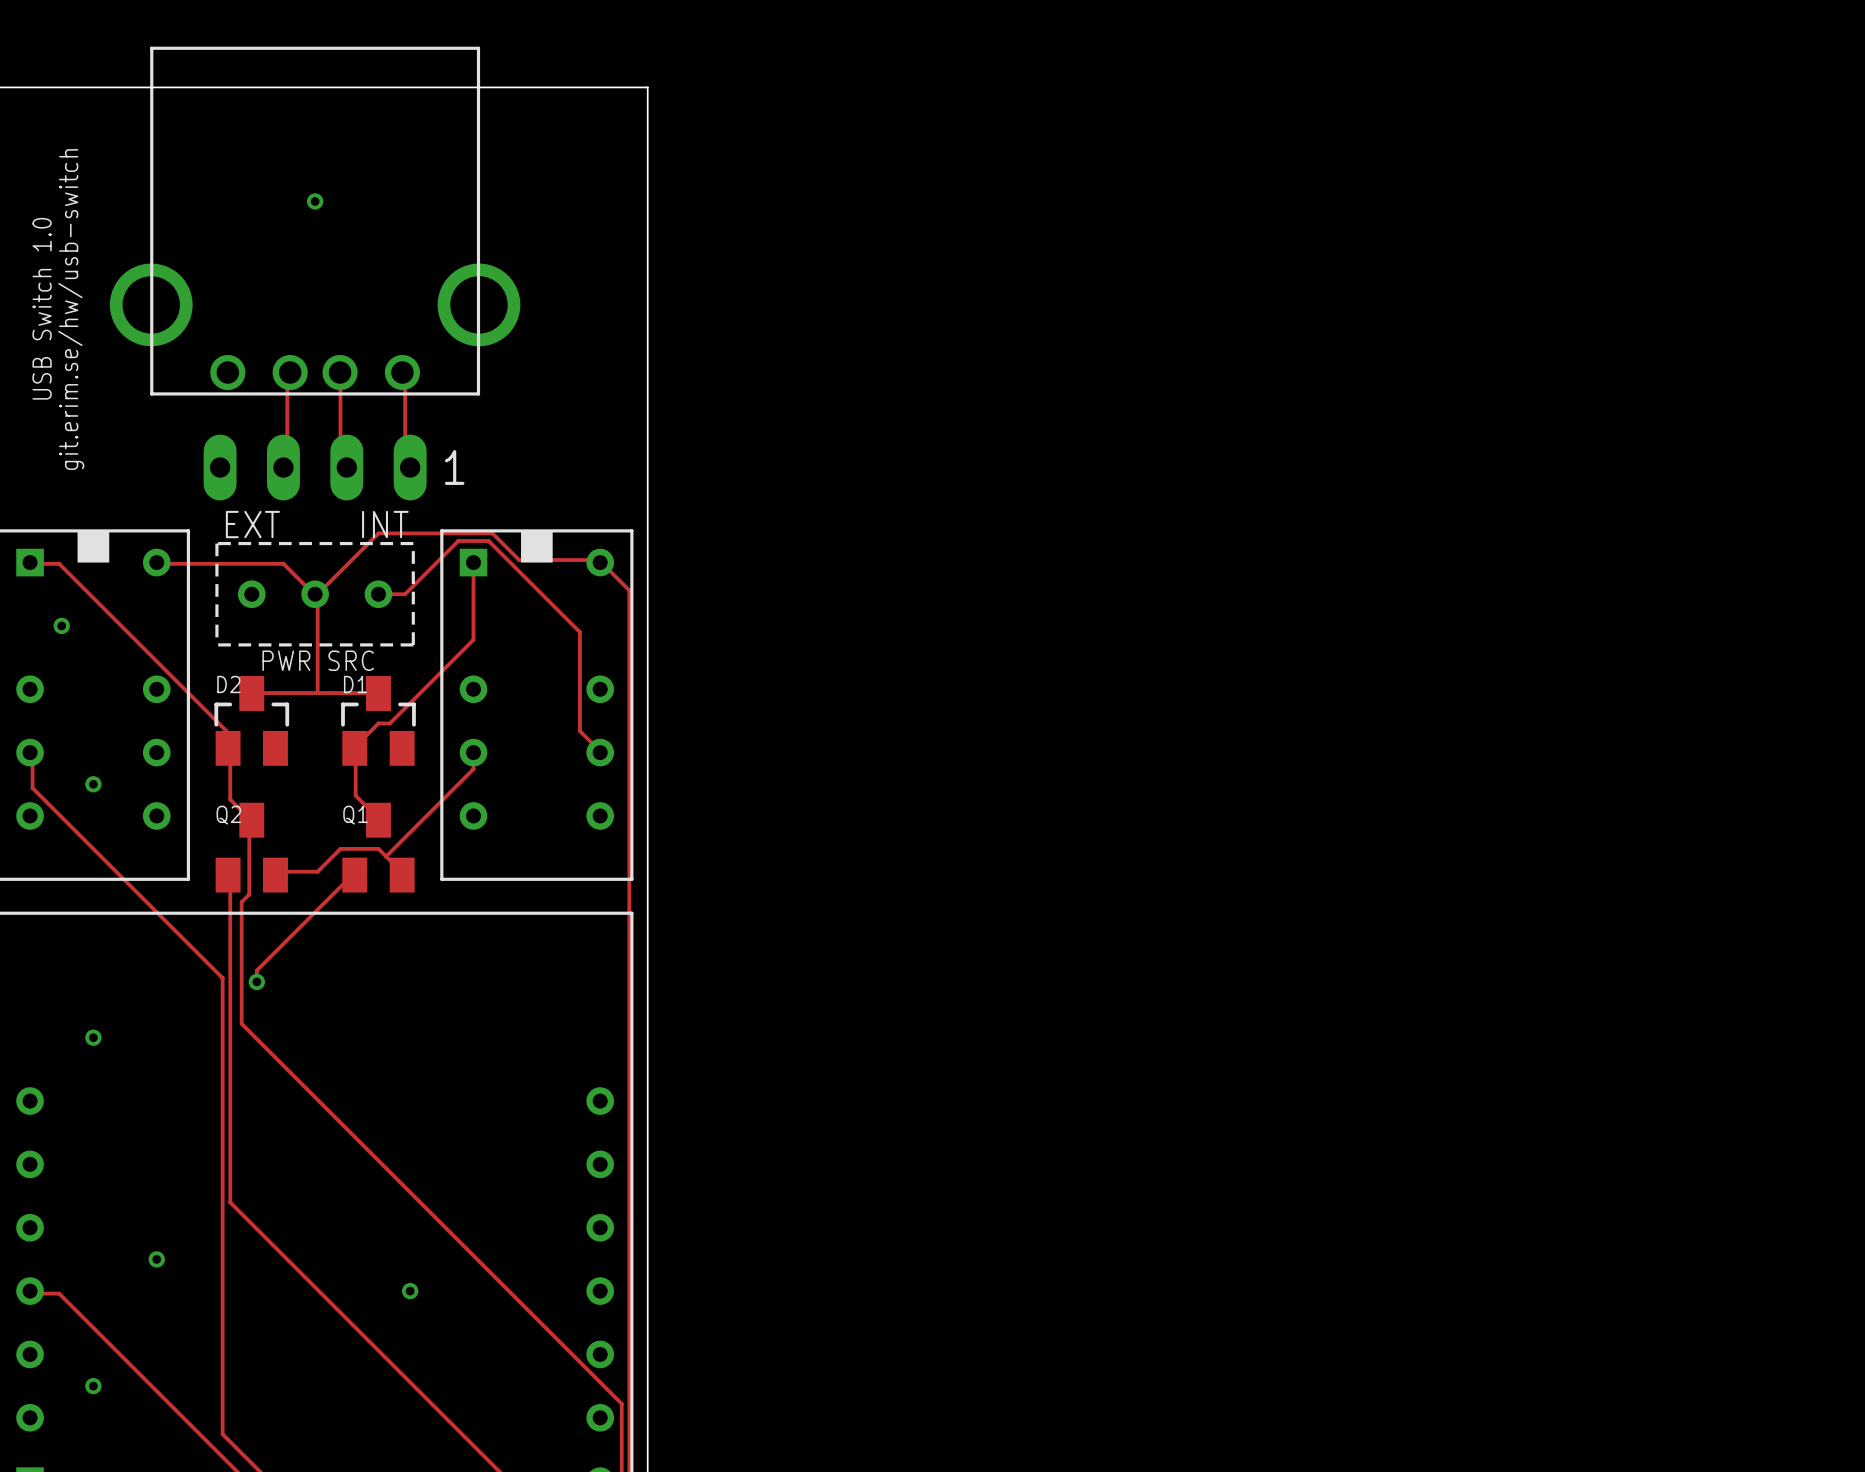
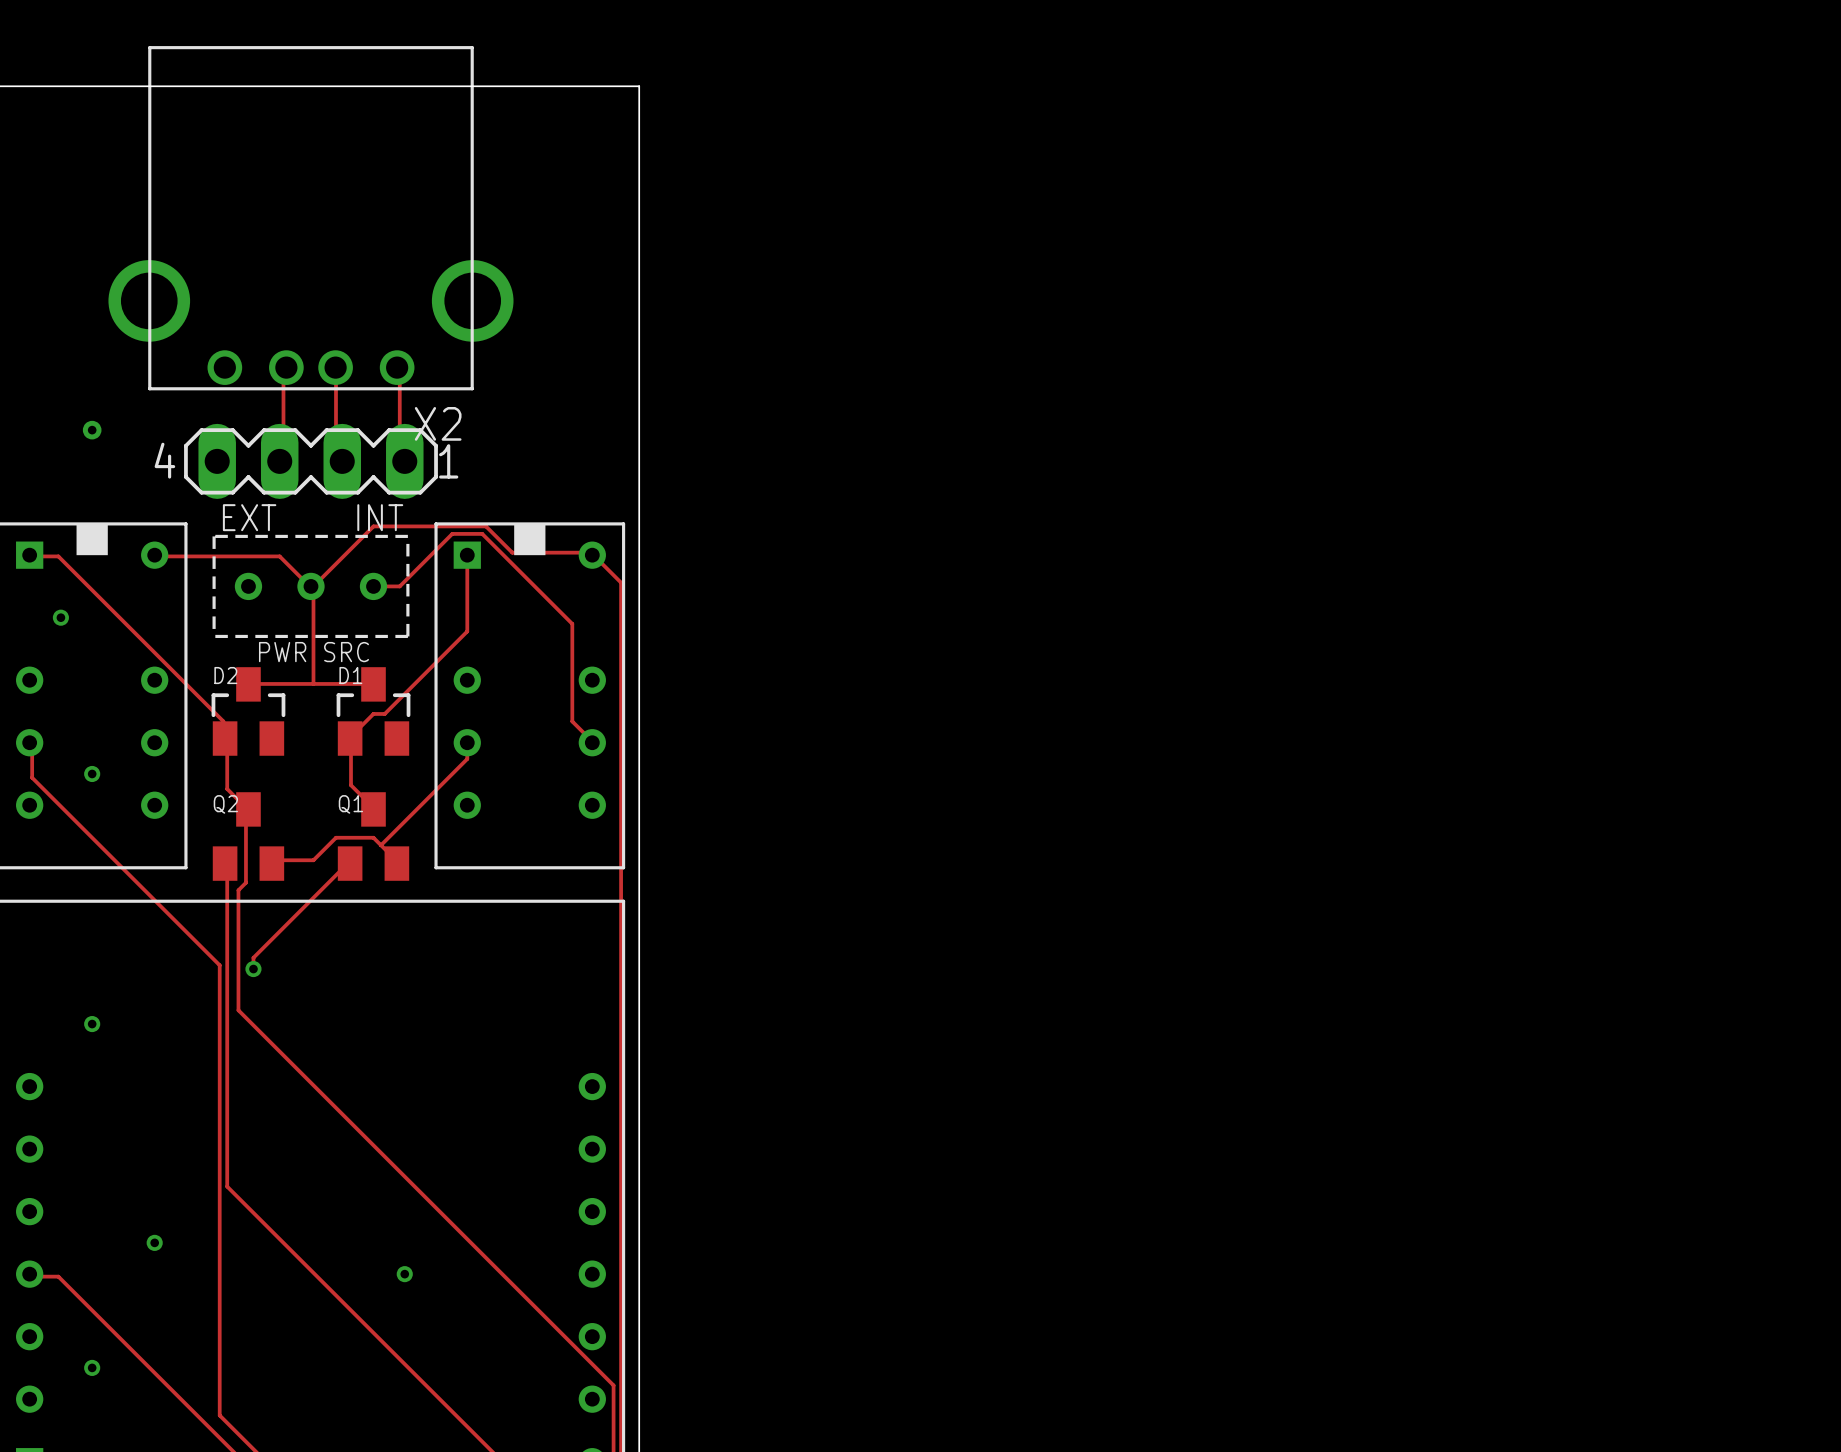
via: (315, 201) -> none
text: USB Switch 1.0 (42, 308) -> none
text: git.erim.se/hw/usb-switch (71, 309) -> none
X2 name: none -> X2 (438, 423)
part footprint: [203, 434, 427, 501] -> [184, 423, 438, 499]
via: none -> (92, 430)

